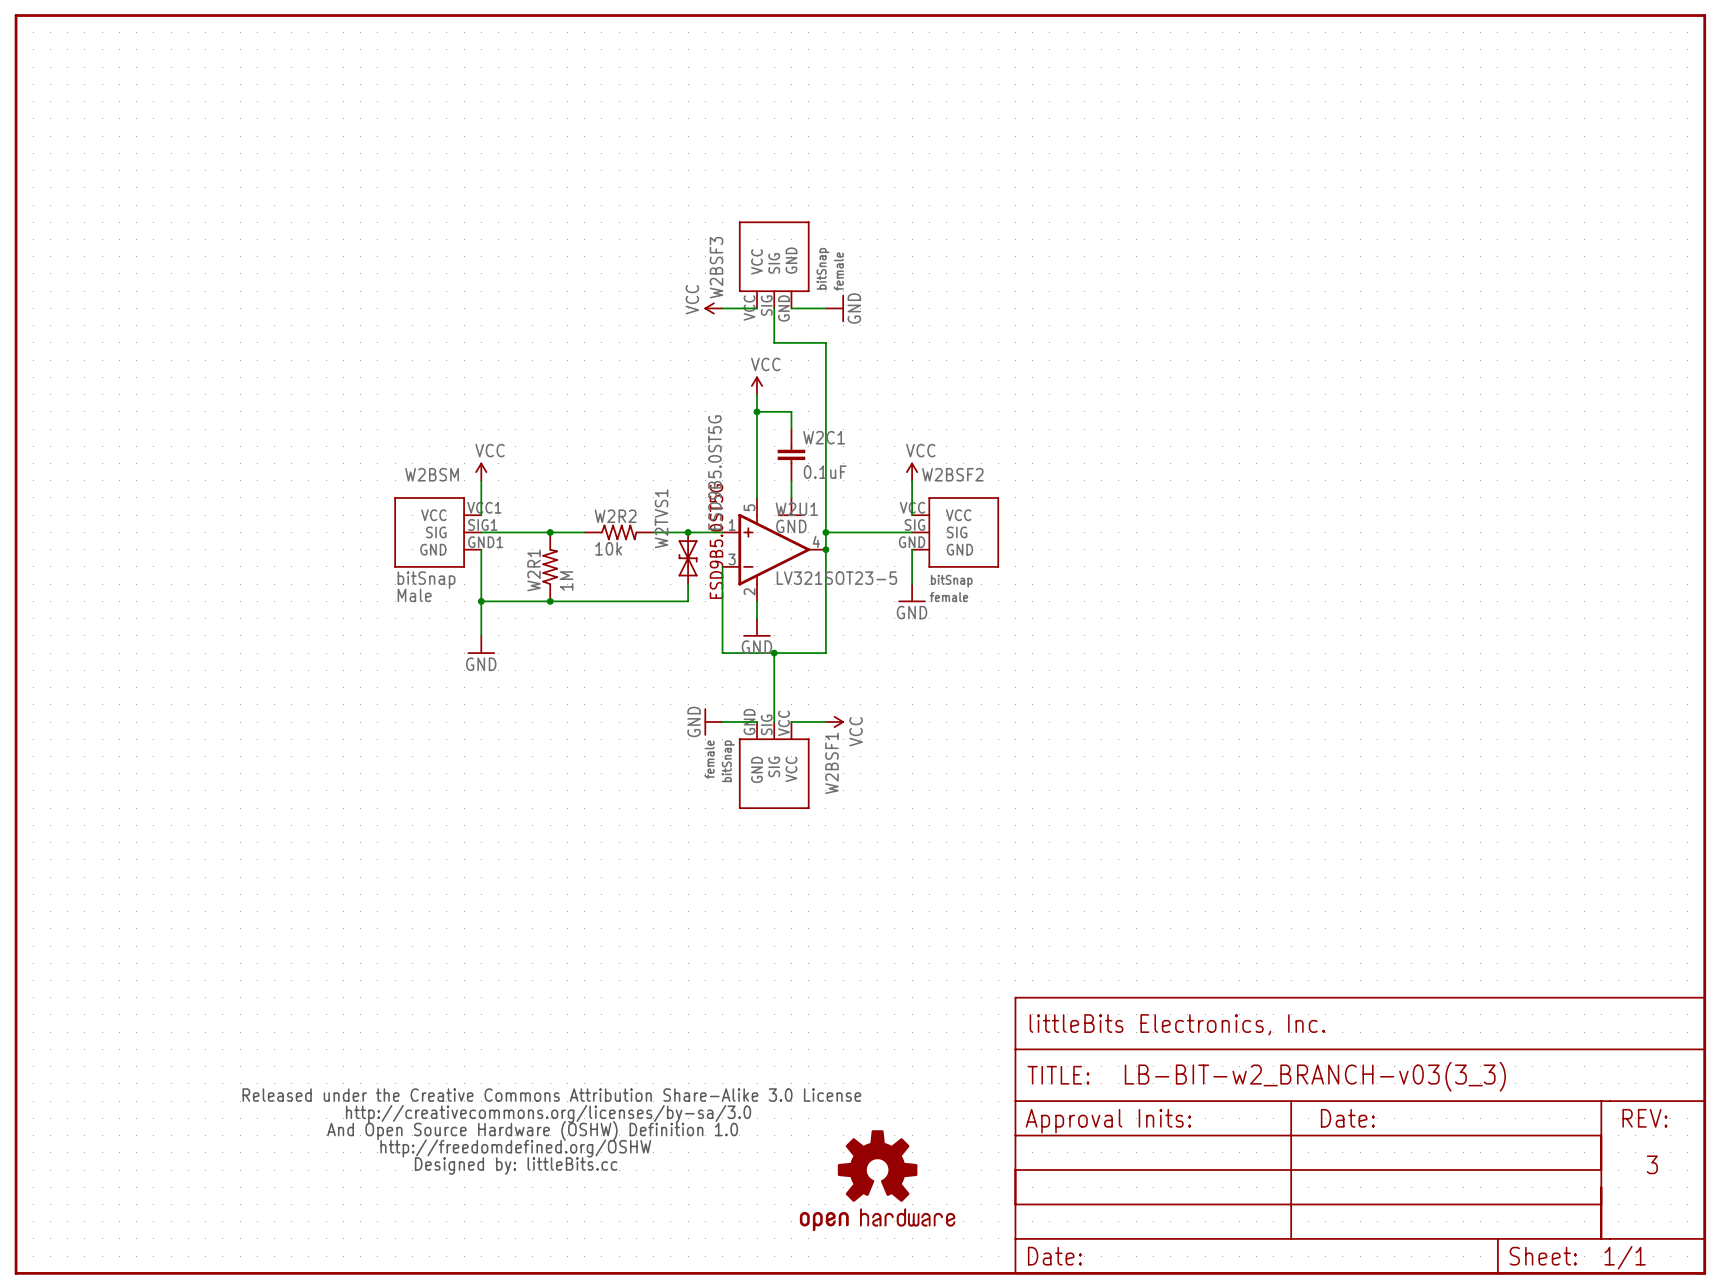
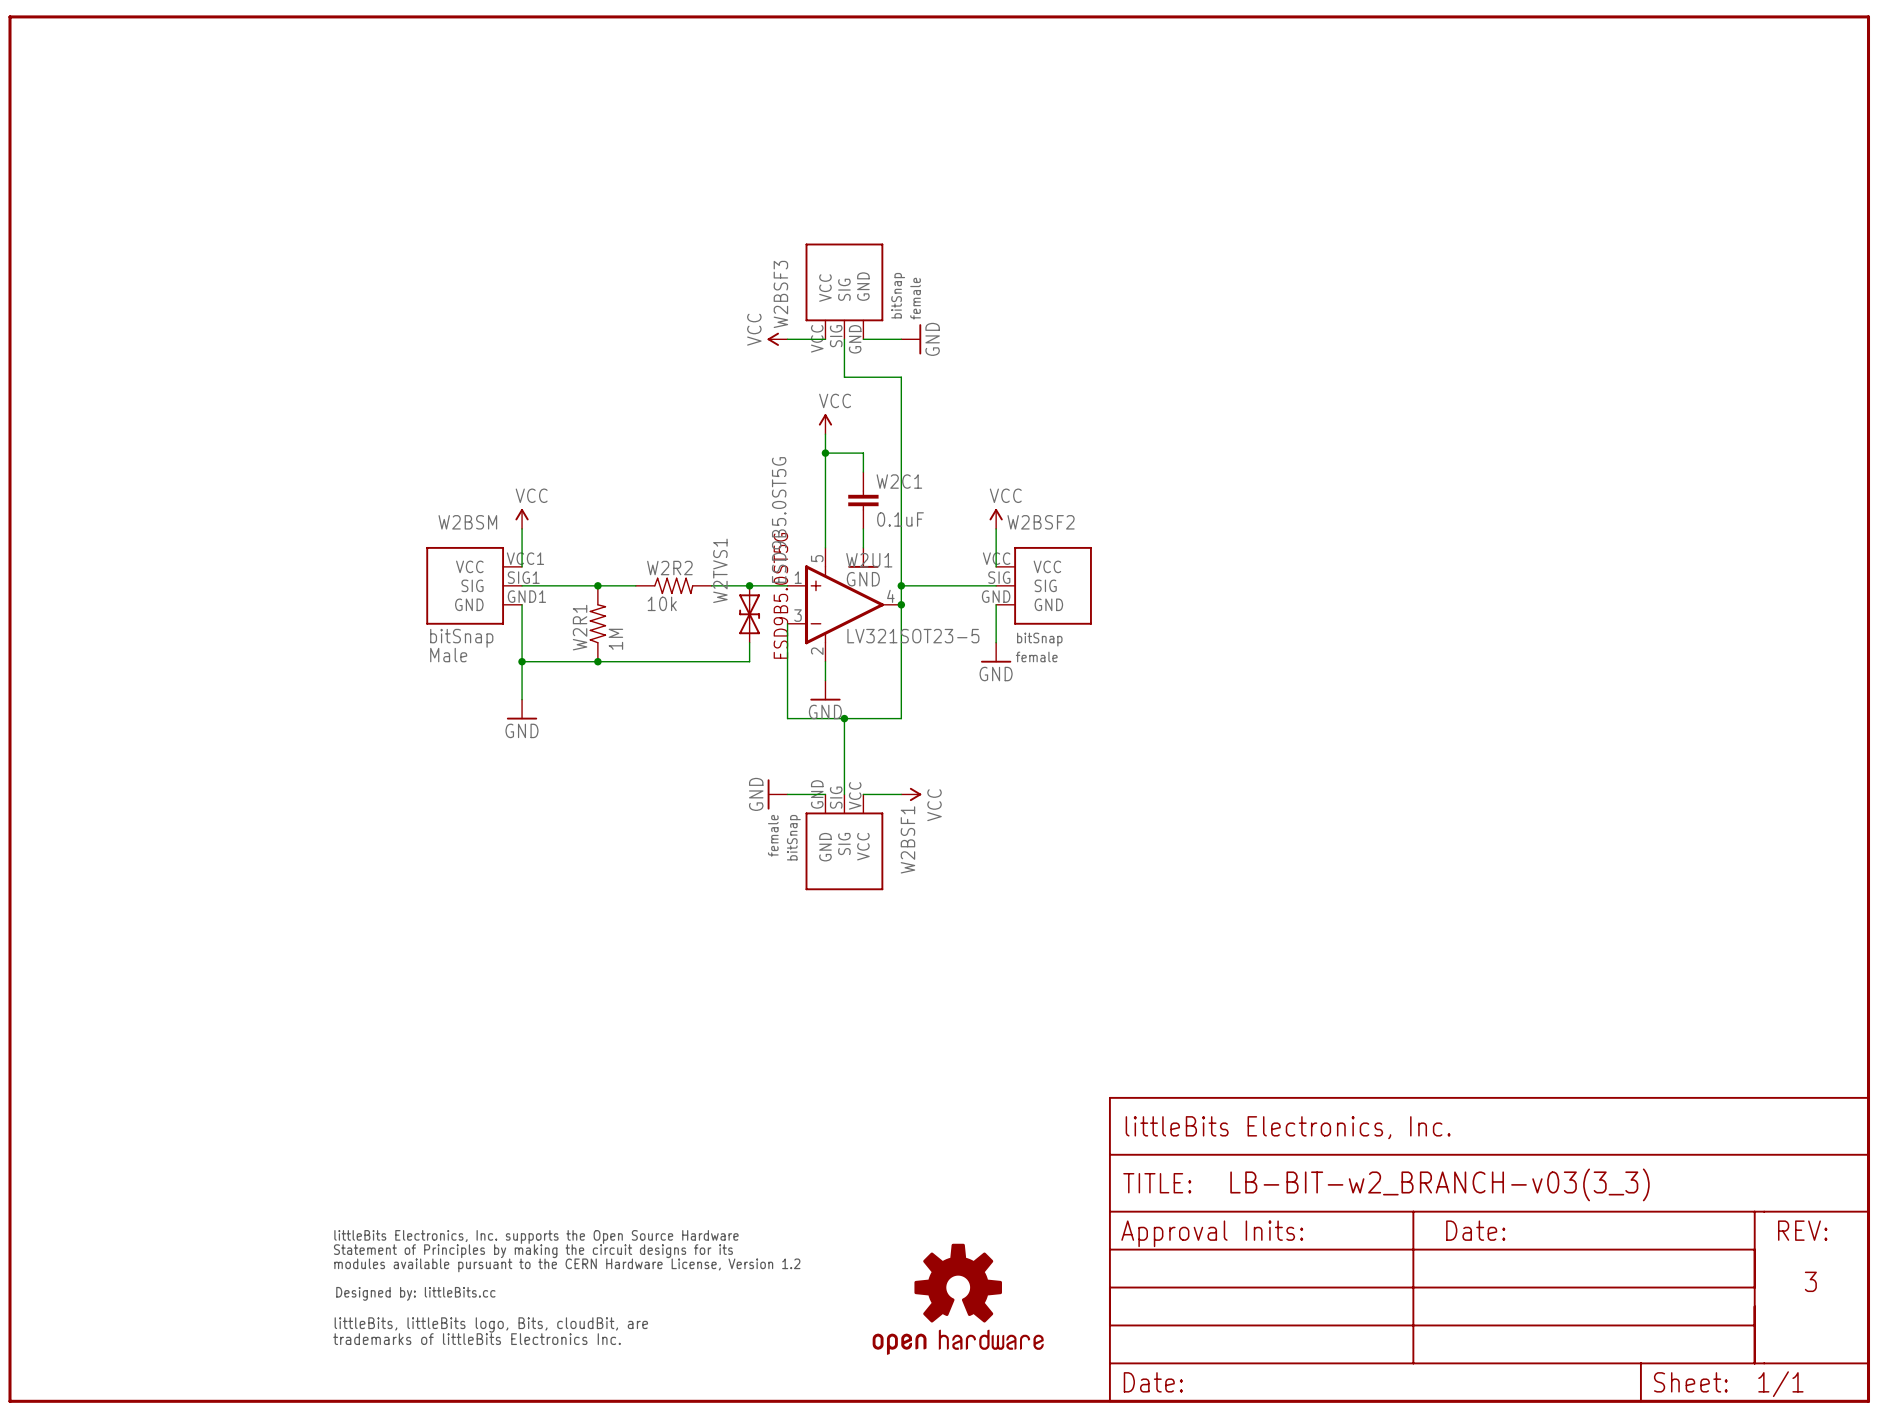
part: (551, 1131) -> none
part: none -> (566, 1287)

